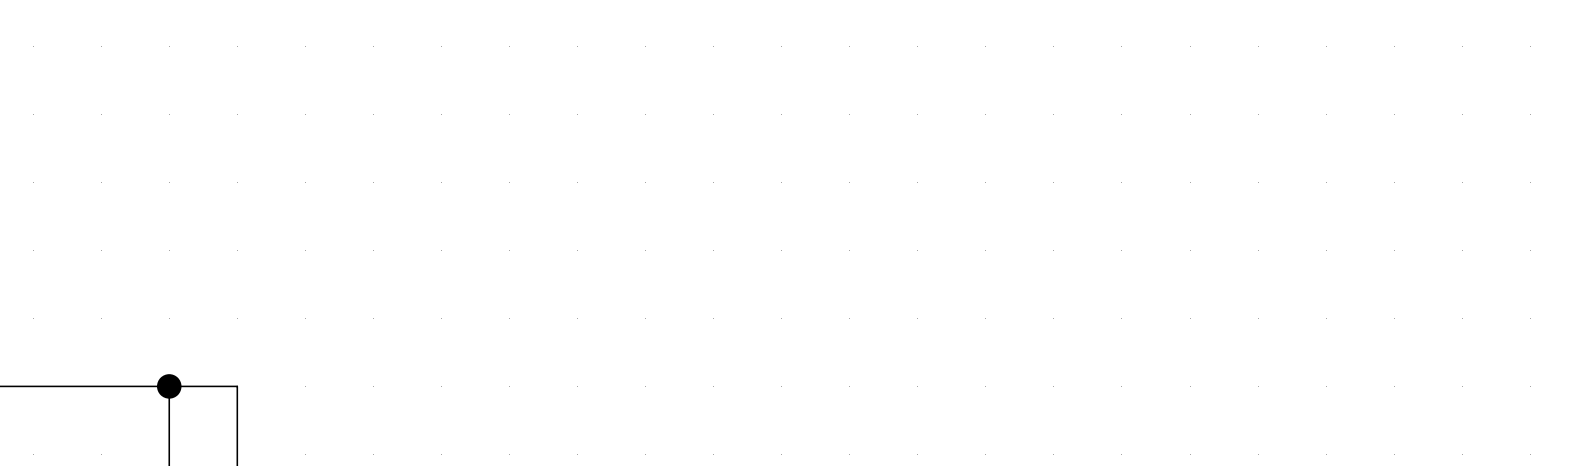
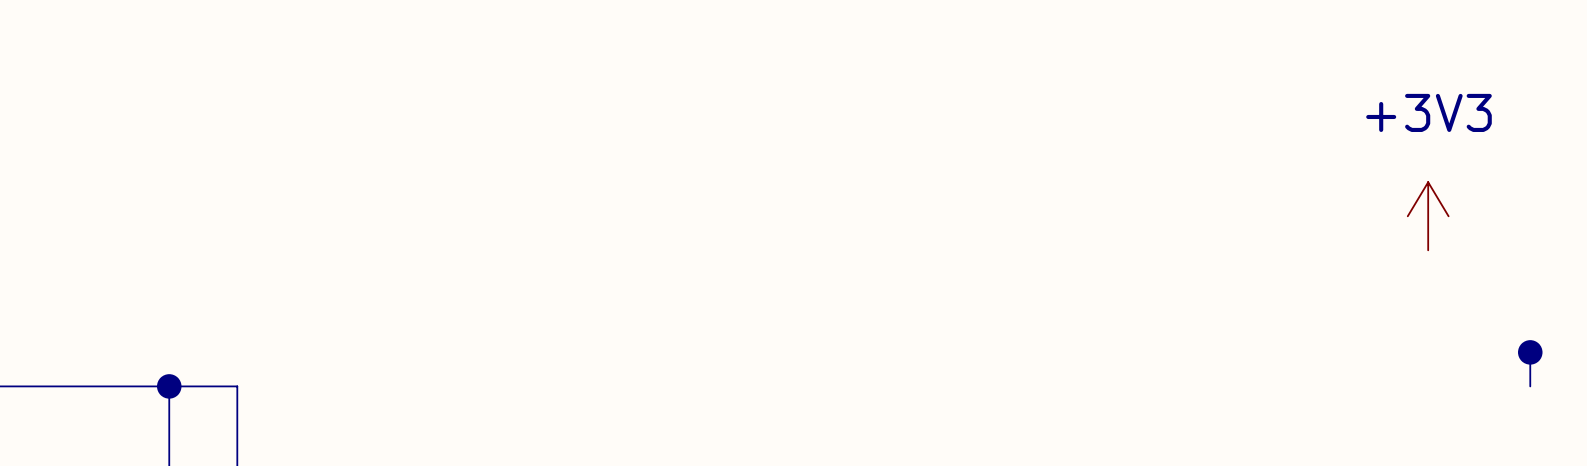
power symbol: none -> +3V3 (1428, 216)
wire: none -> (1530, 352) (1530, 386)
junction: none -> (1530, 352)

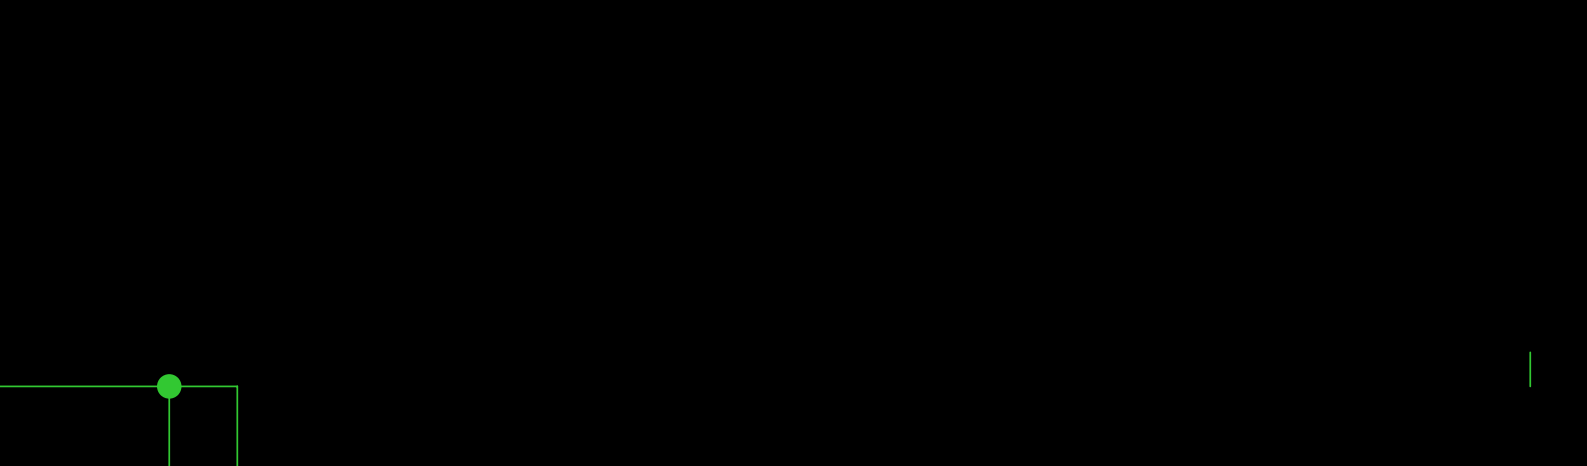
power symbol: +3V3 (1428, 216) -> none
junction: (1530, 352) -> none

